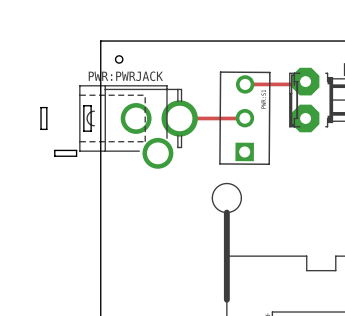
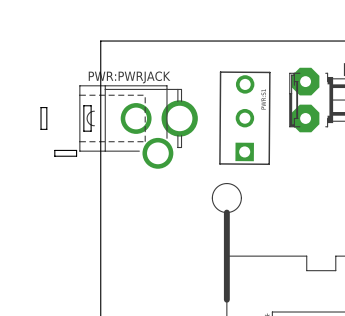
hole: (119, 59) -> none
top track: (245, 84) (302, 84) -> none
top track: (179, 118) (244, 118) -> none

